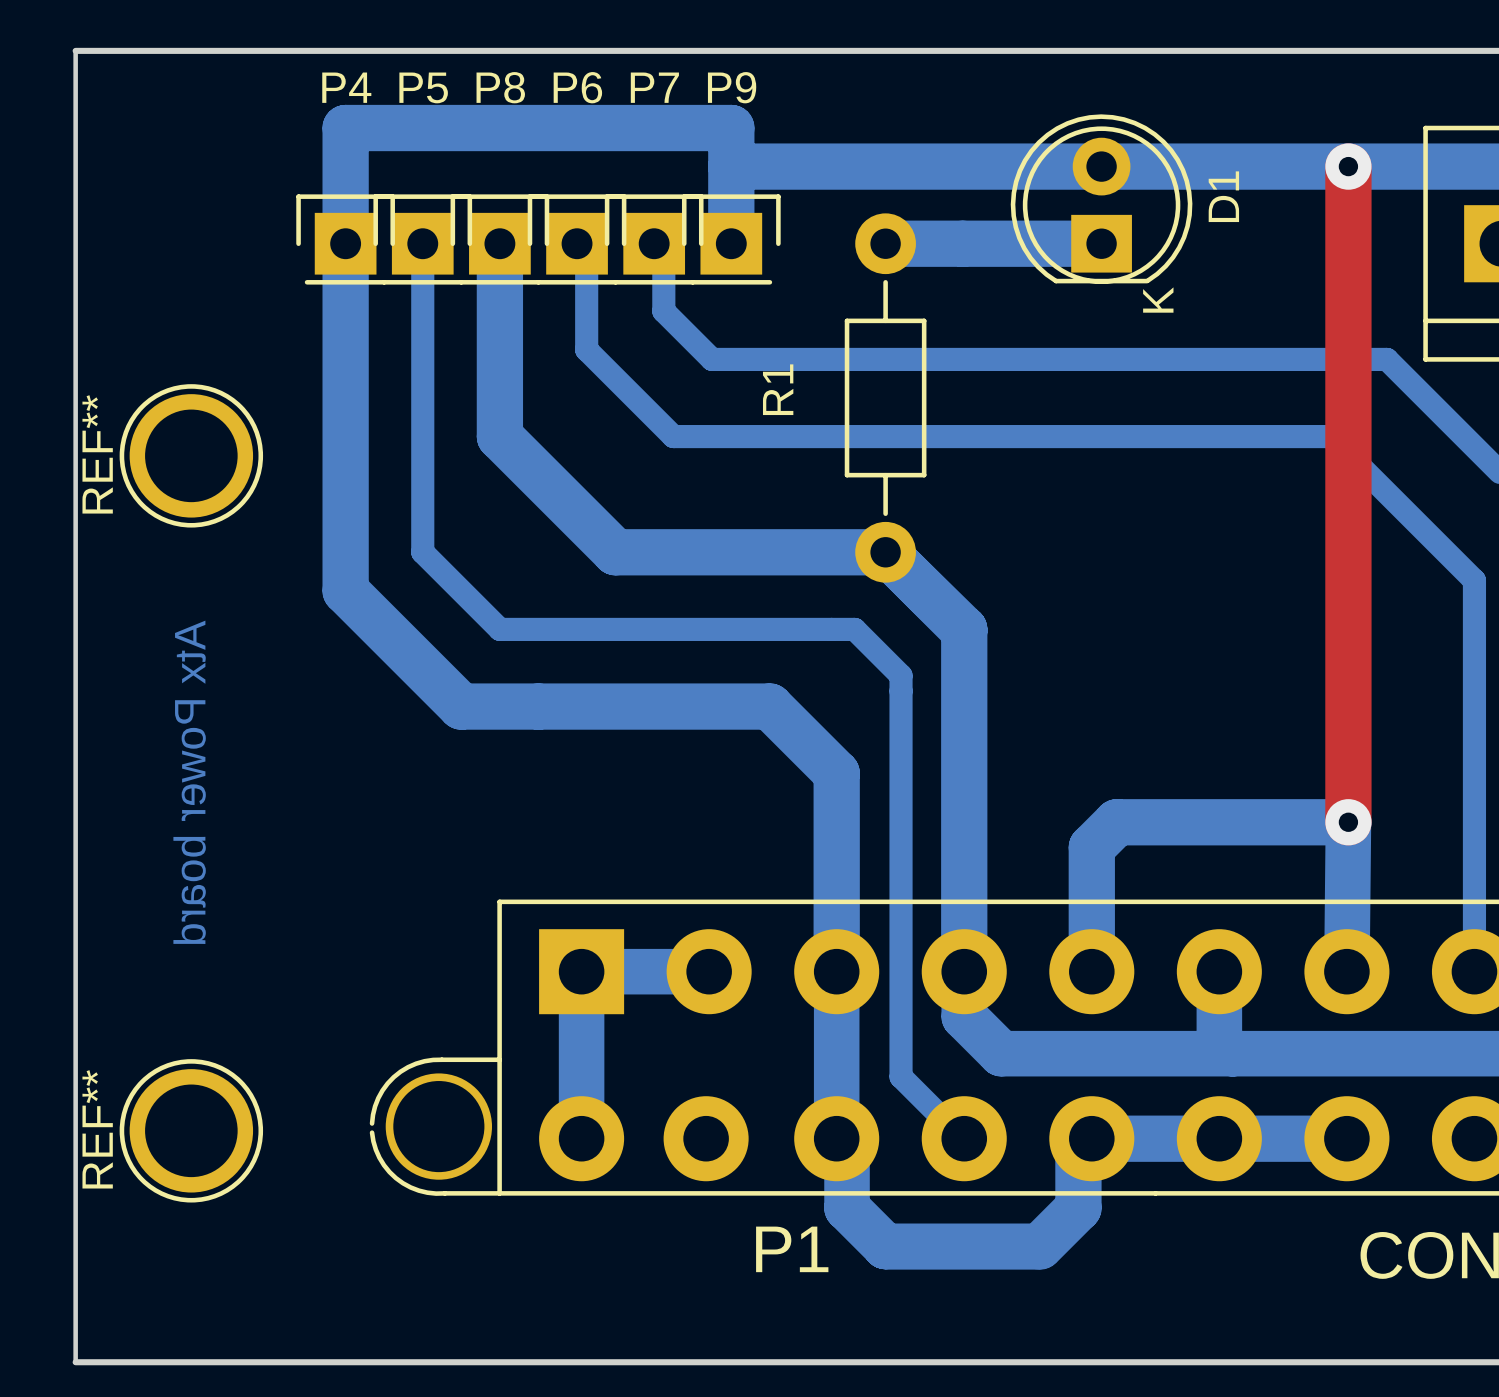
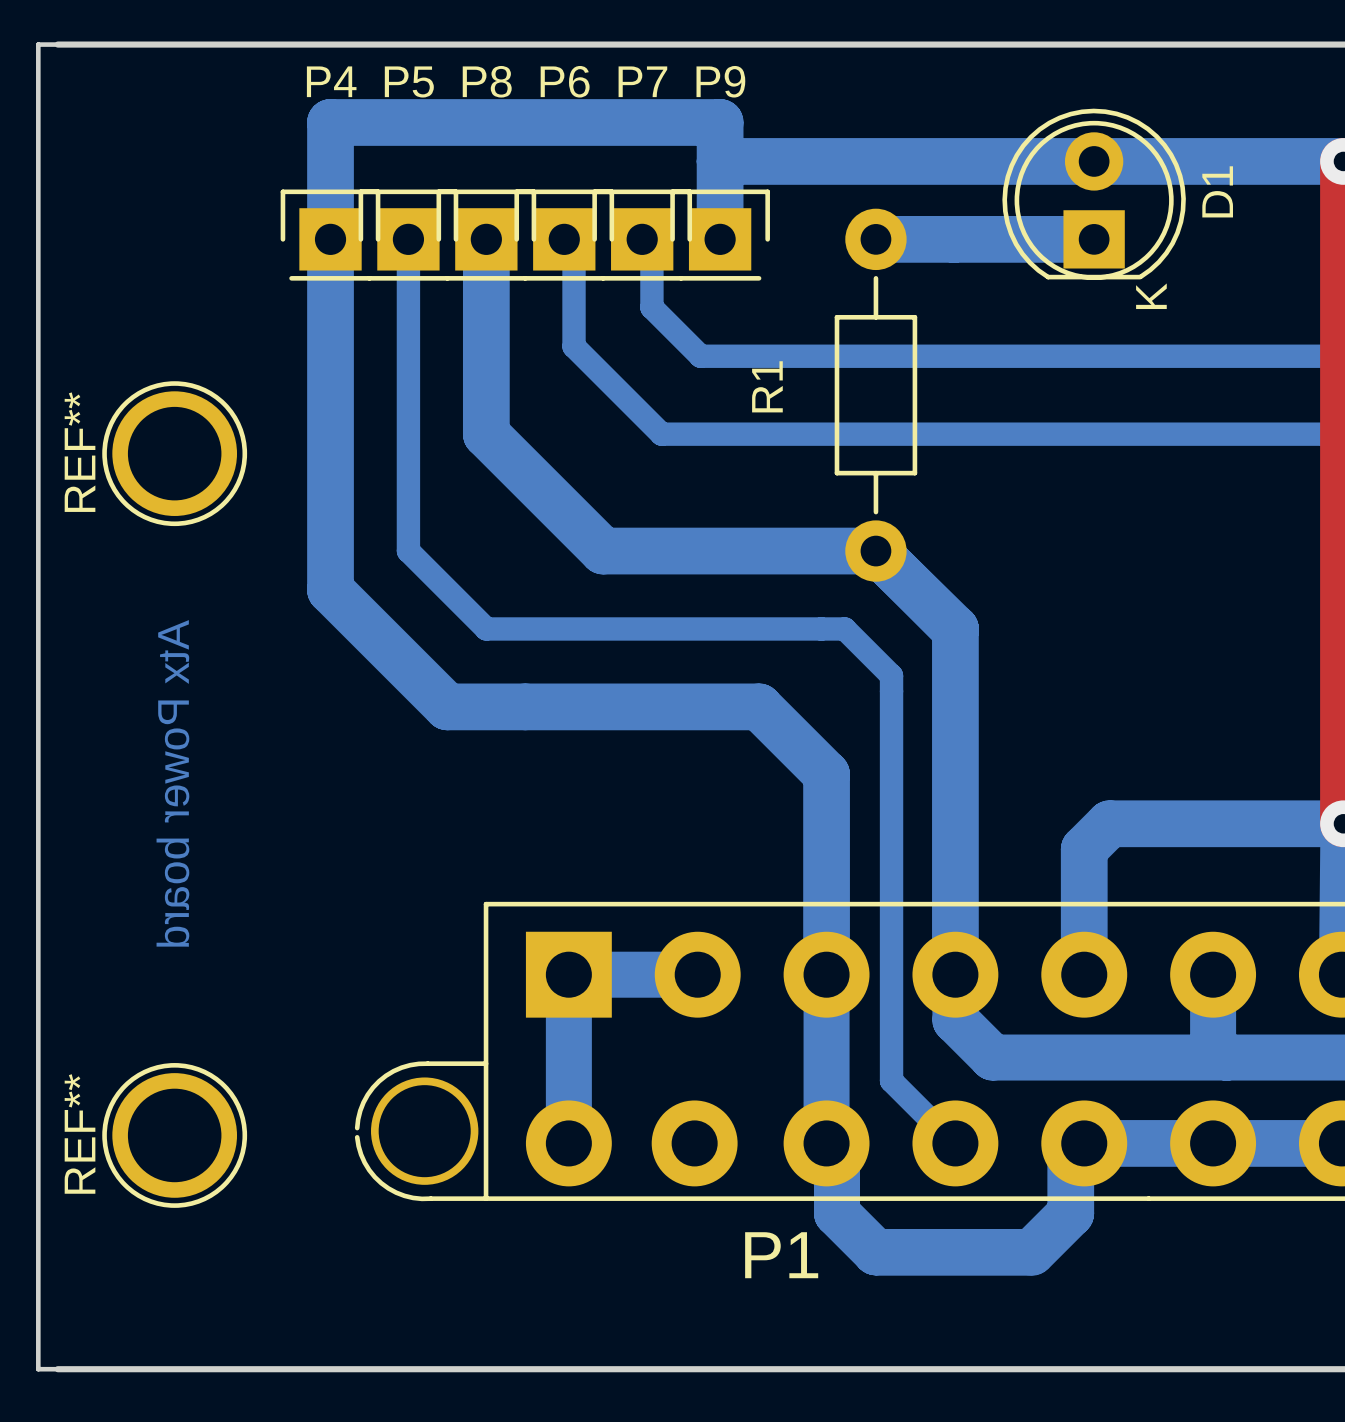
board edge: (75, 50) (75, 1362) -> (57, 44) (38, 44) (38, 1369) (57, 1369)

